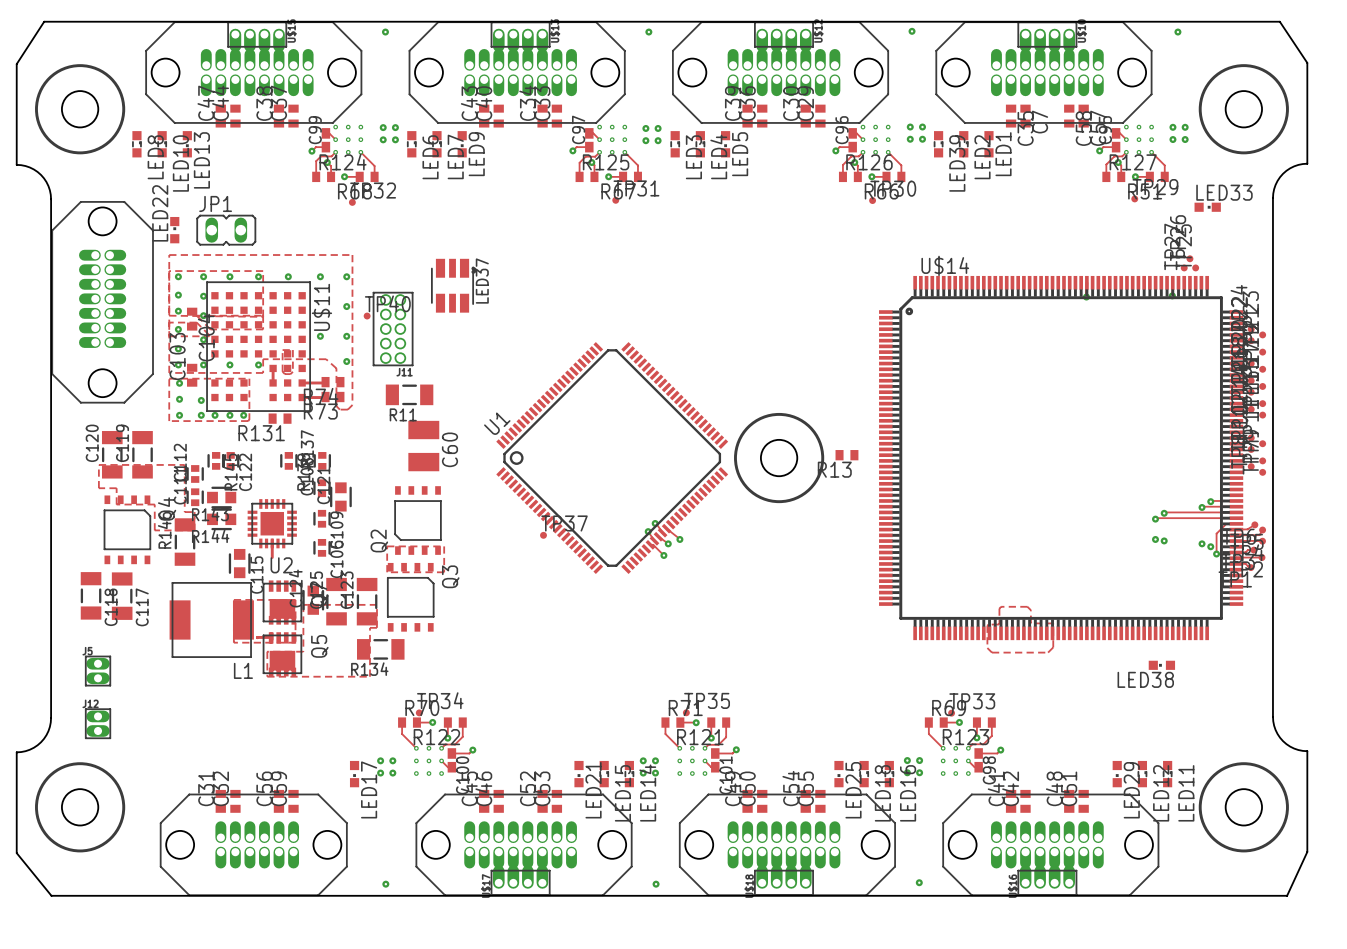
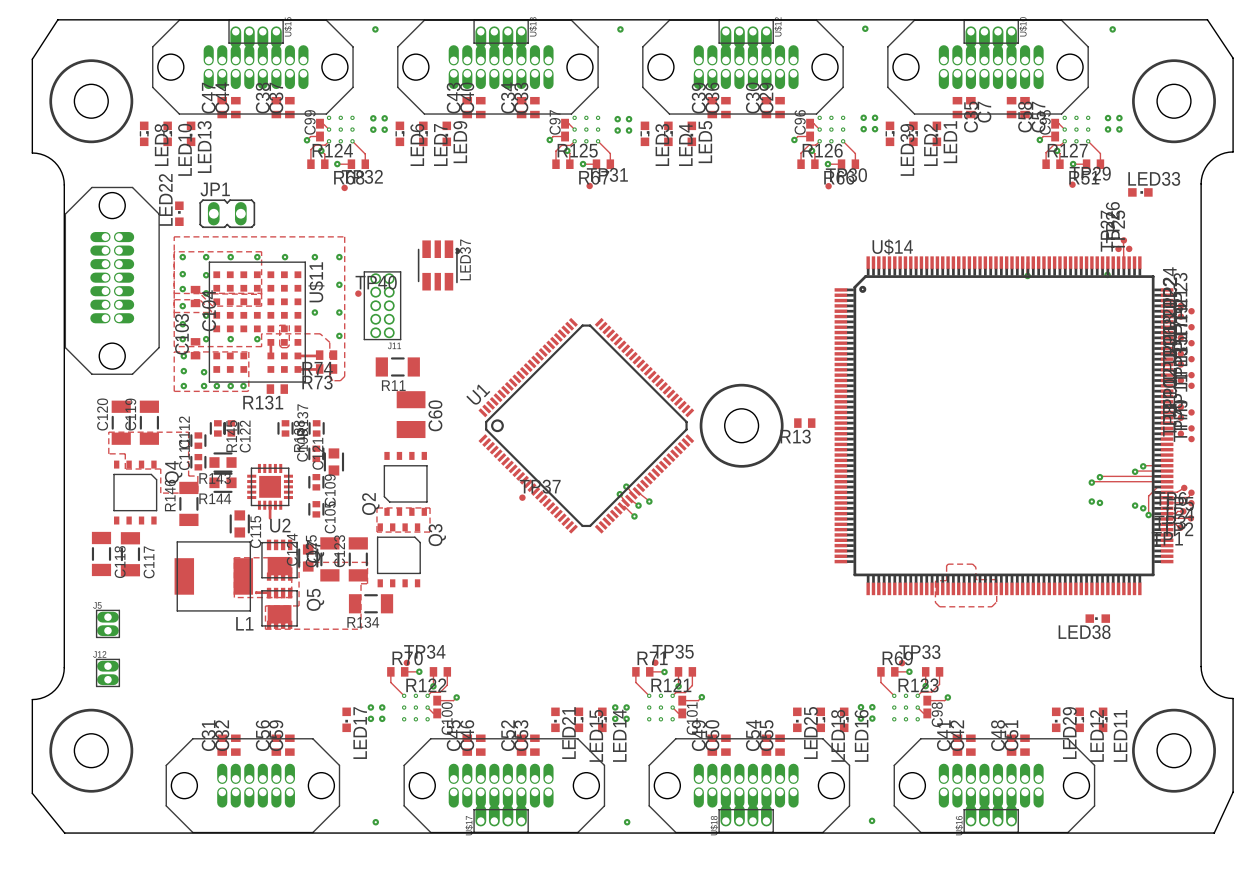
track: none -> (1123, 241) (1123, 262)

